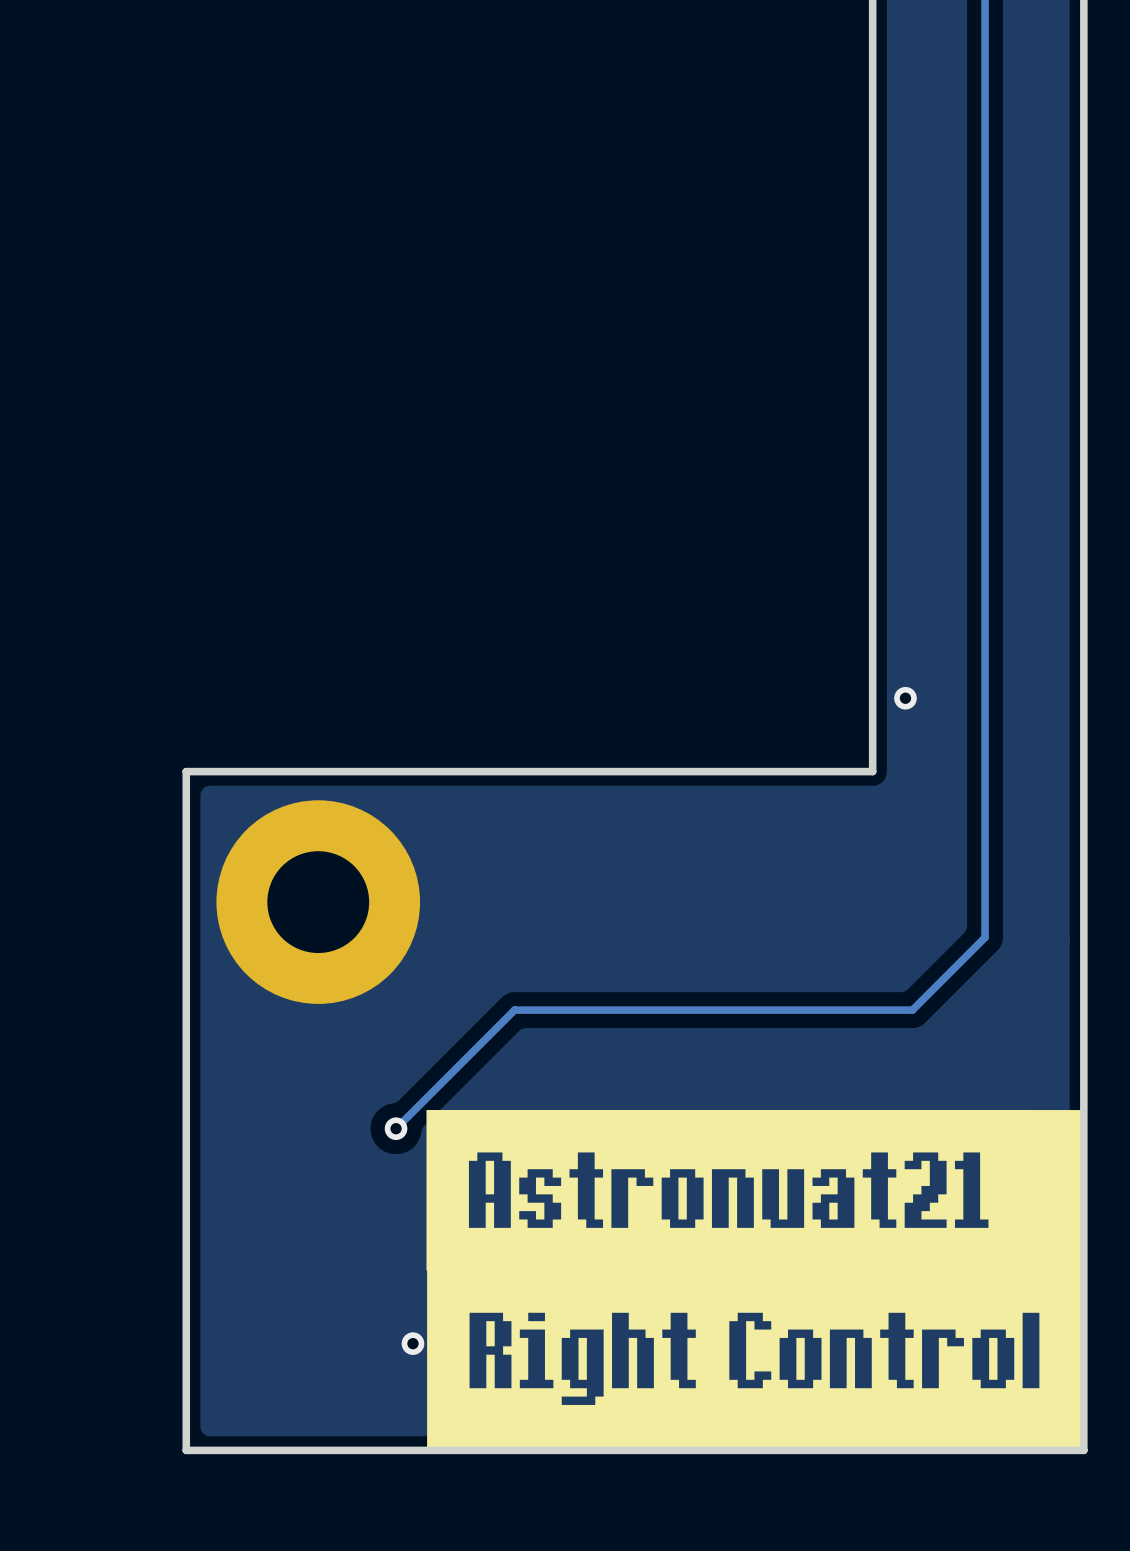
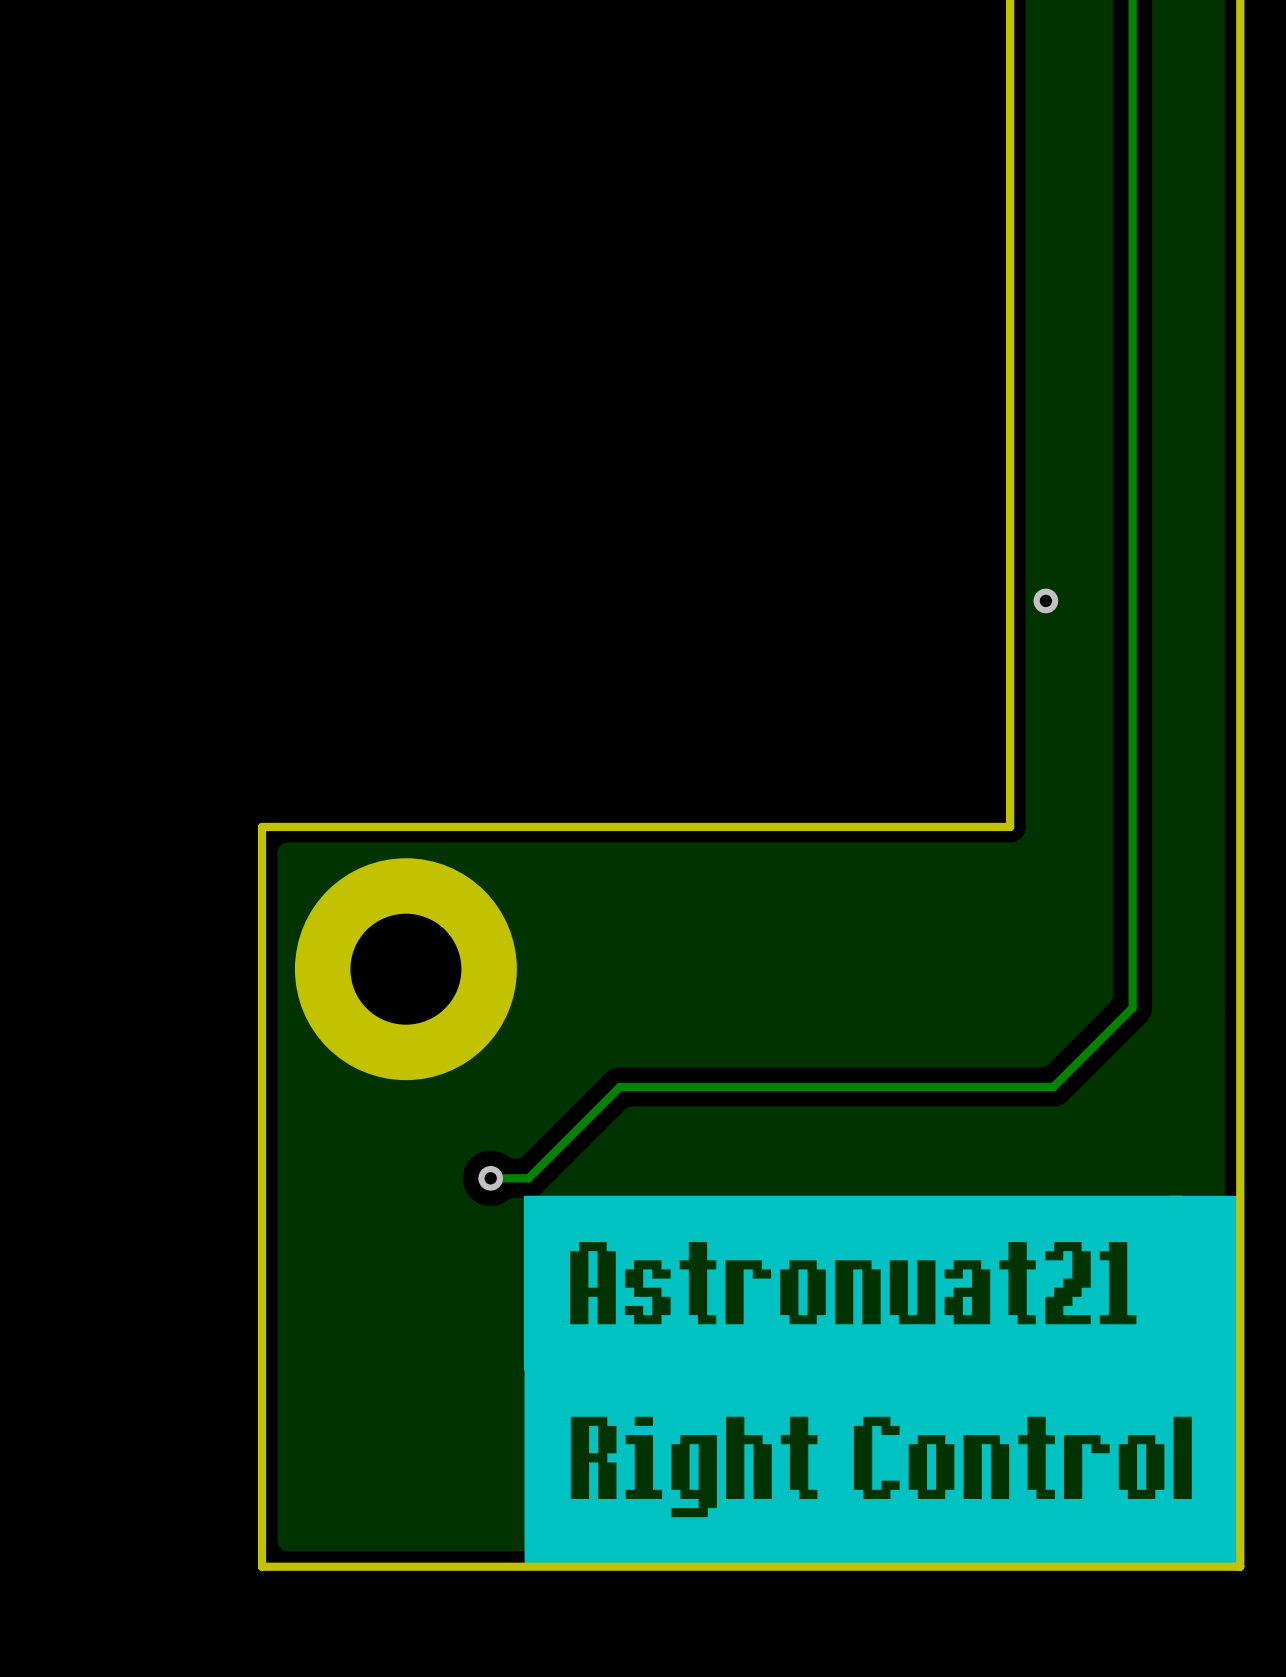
via position: (905, 698) -> (1045, 600)
track: (430, 1094) (396, 1128) -> (528, 1178) (490, 1178)
via position: (396, 1128) -> (490, 1178)
via: (412, 1343) -> none

